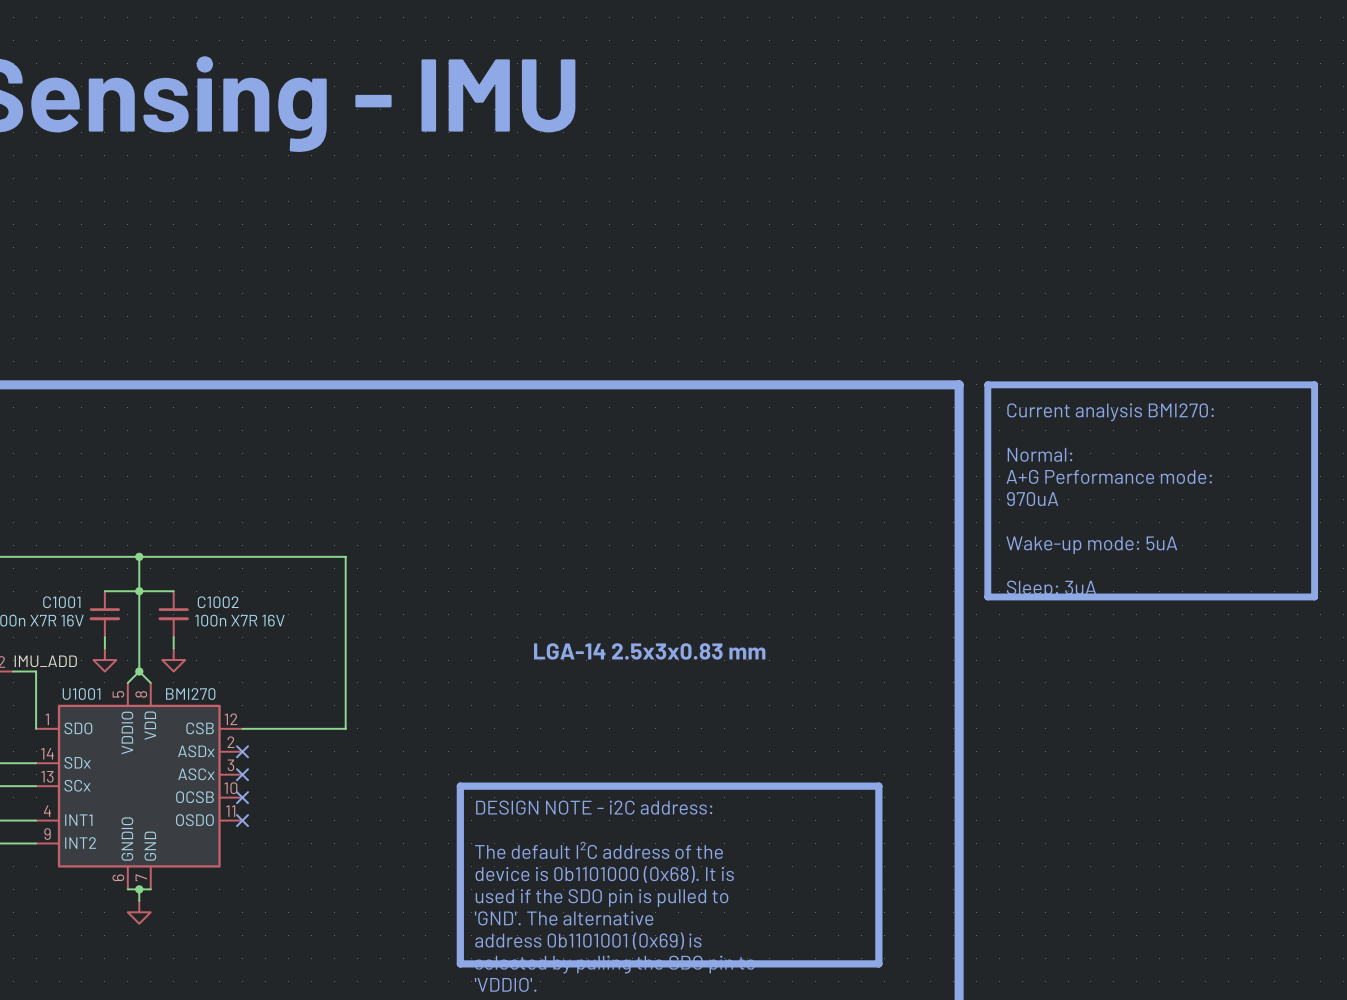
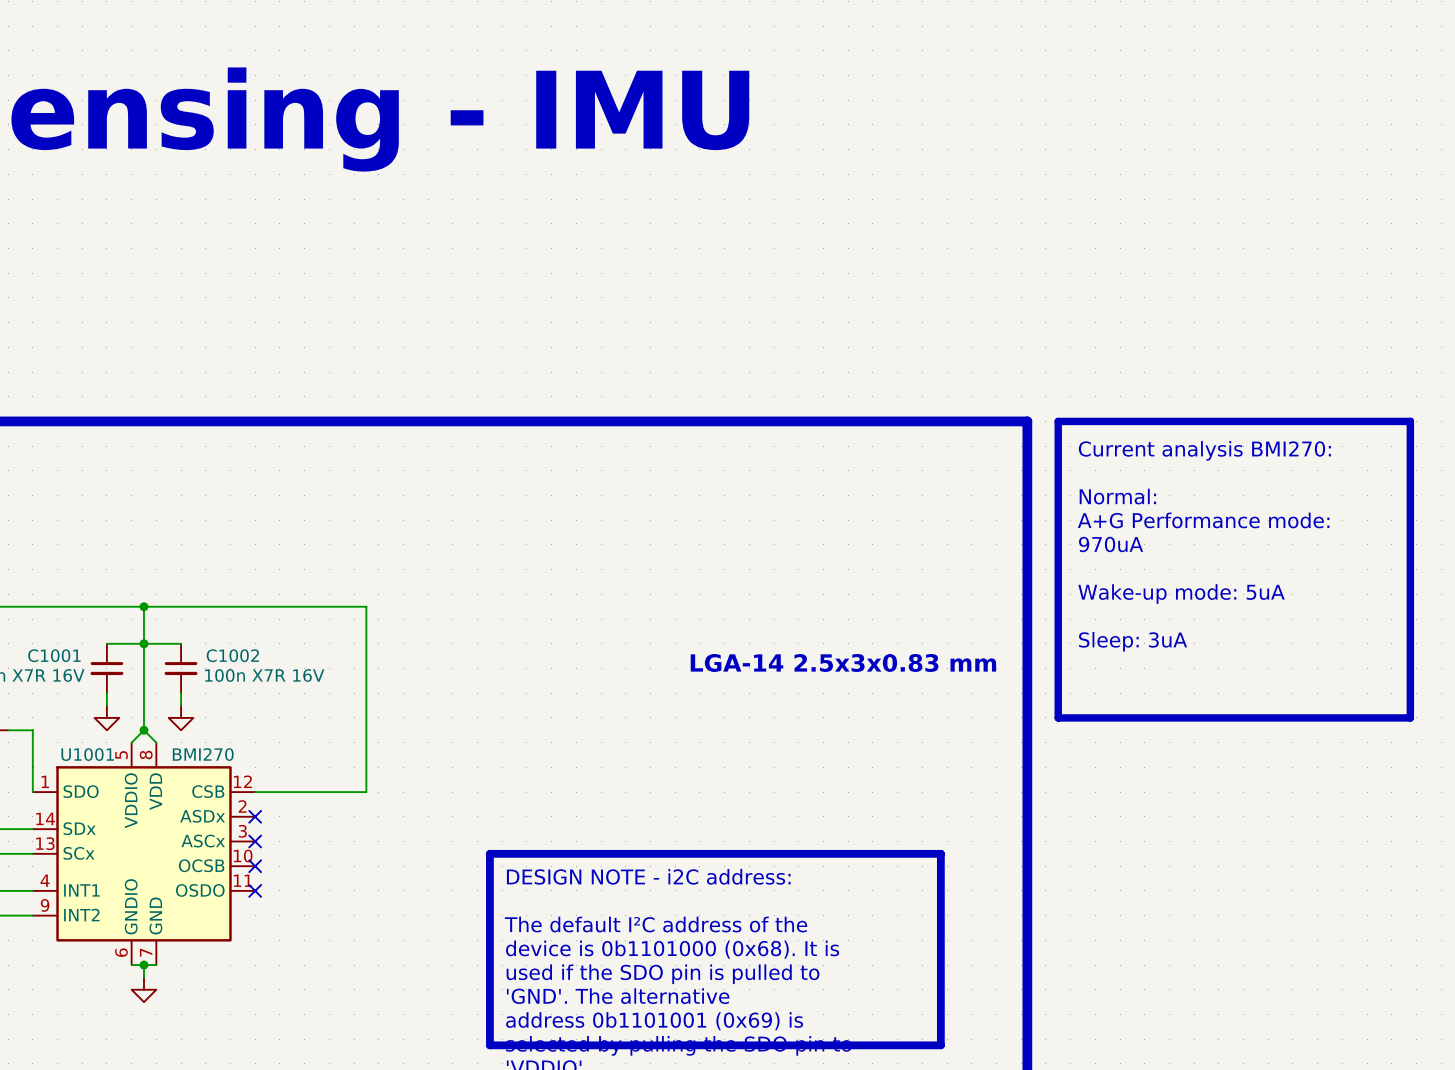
line: (987, 596) (1314, 596) -> (1058, 649) (1058, 717) (1410, 717) (1410, 649)
text position: LGA-14 2.5x3x0.83 mm (649, 651) -> LGA-14 2.5x3x0.83 mm (843, 662)
label: IMU_ADD (45, 661) -> none

